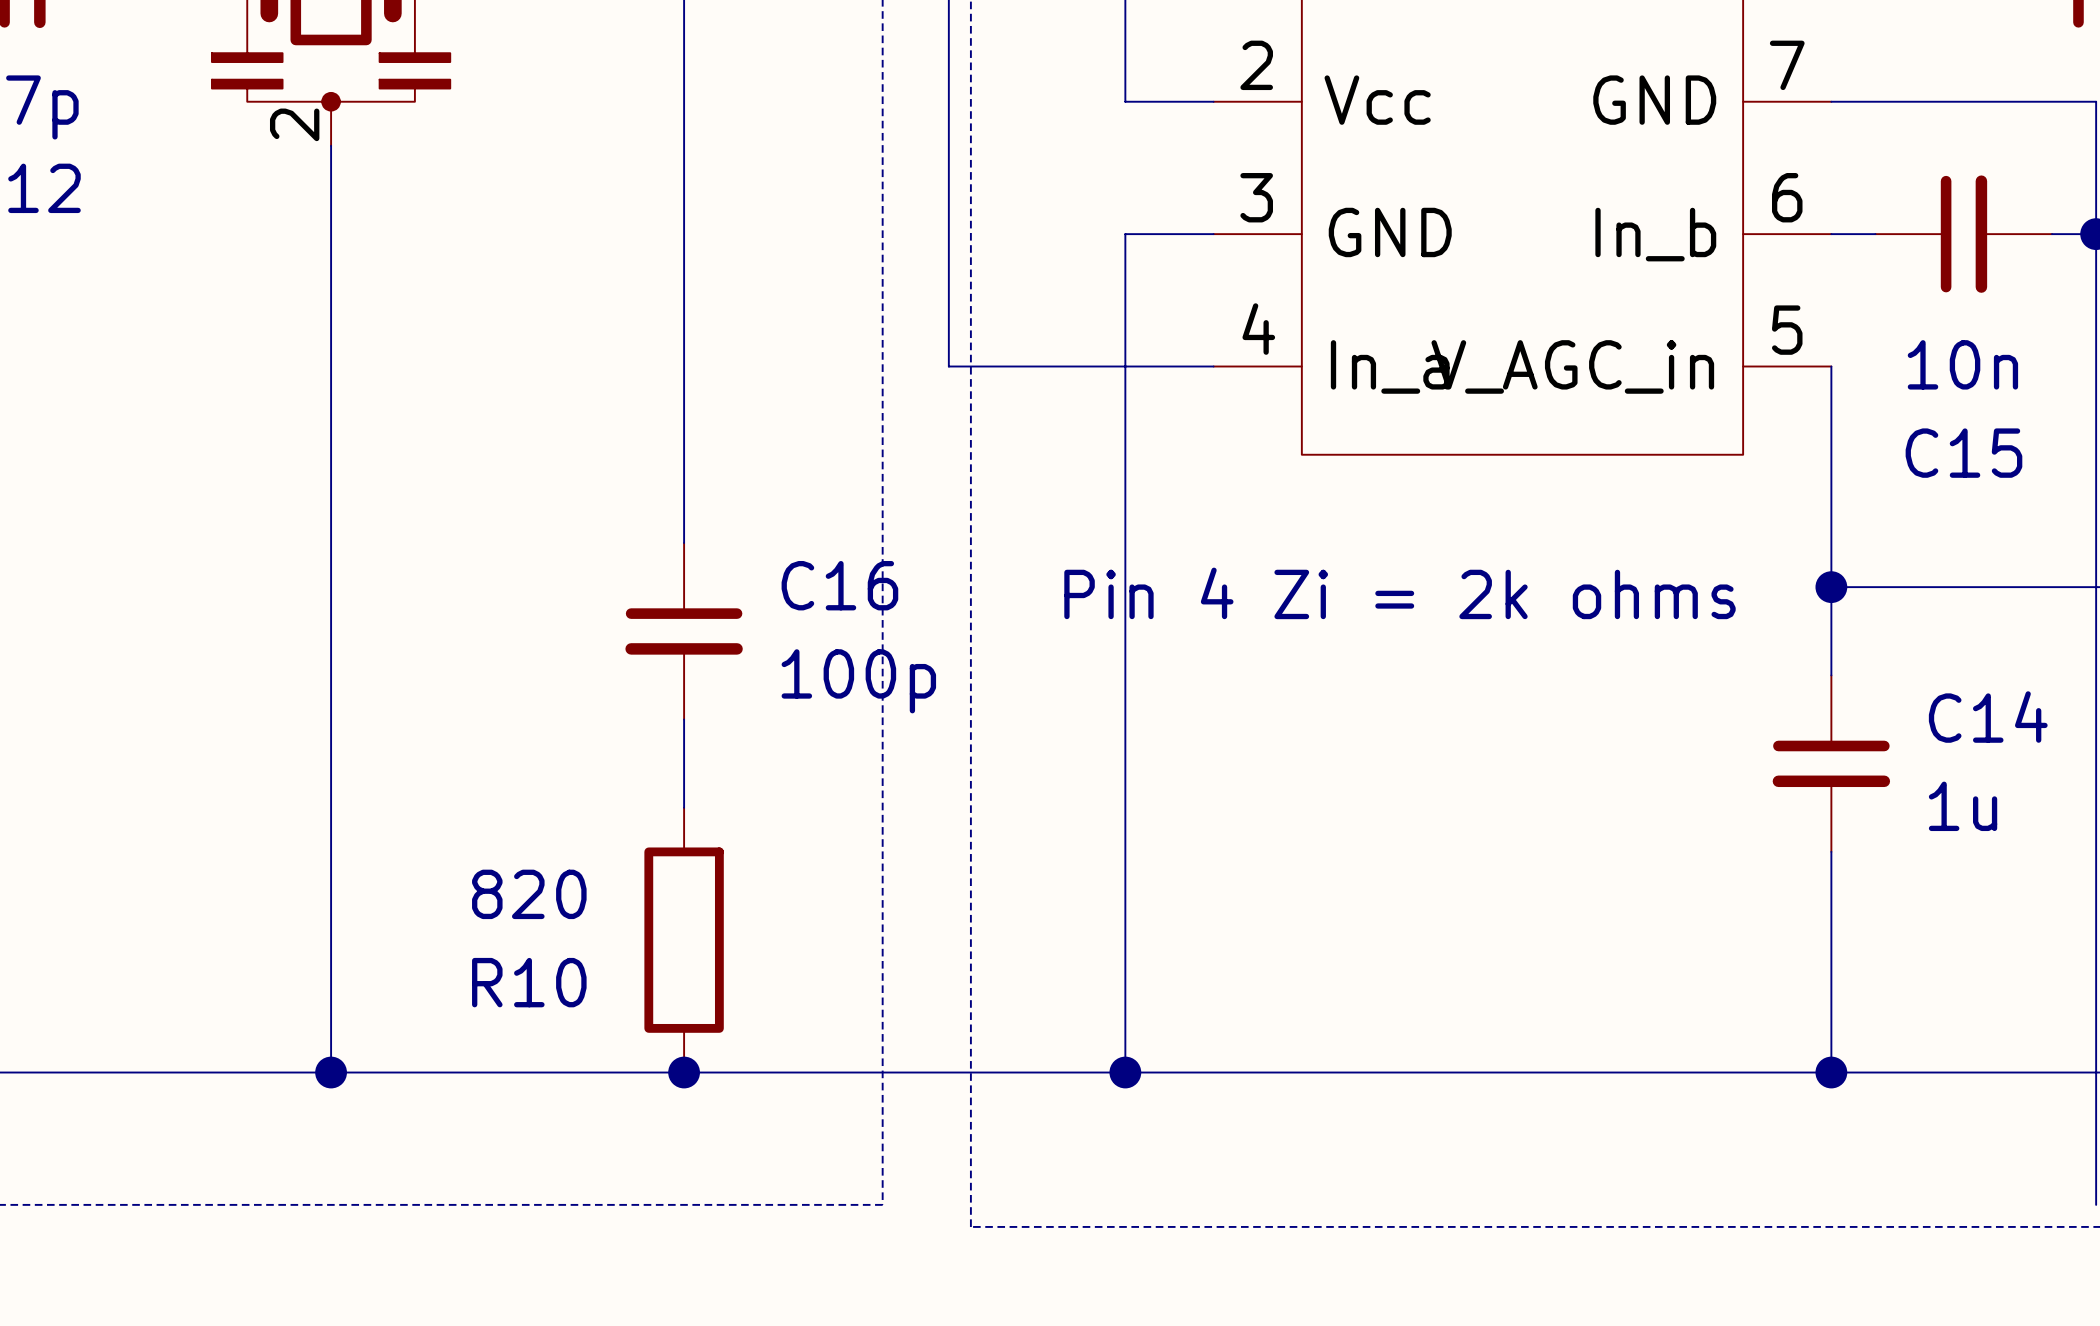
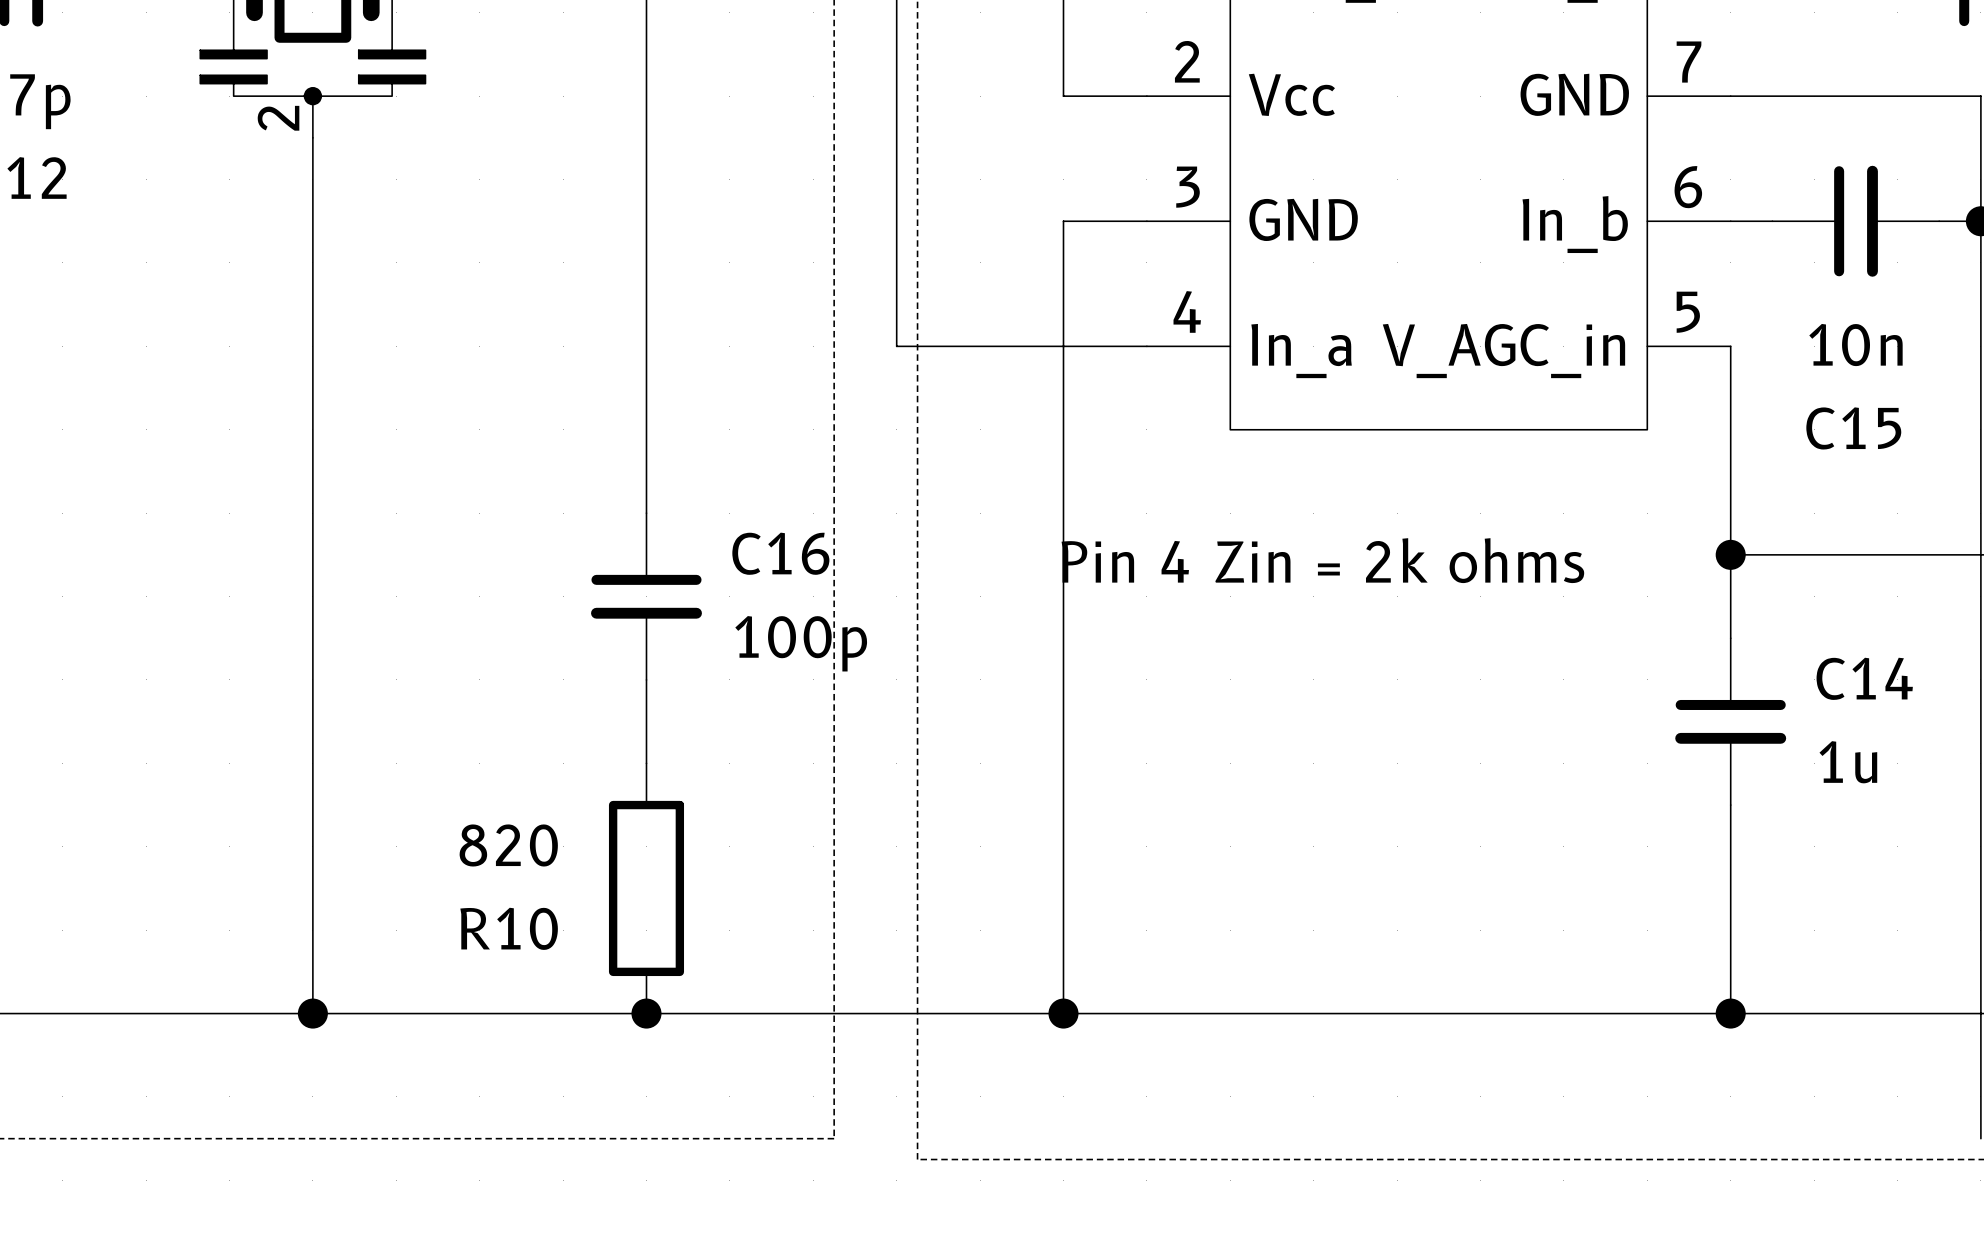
text: Pin 4 Zi = 2k ohms (1399, 593) -> Pin 4 Zin = 2k ohms (1322, 560)

